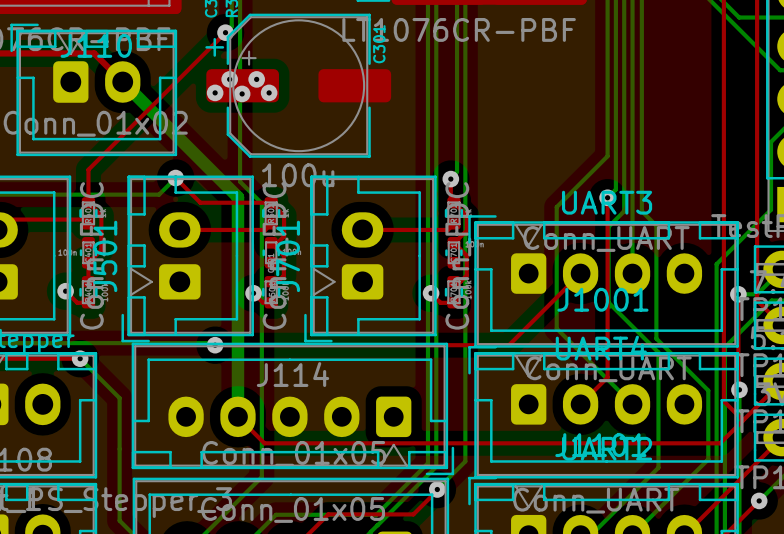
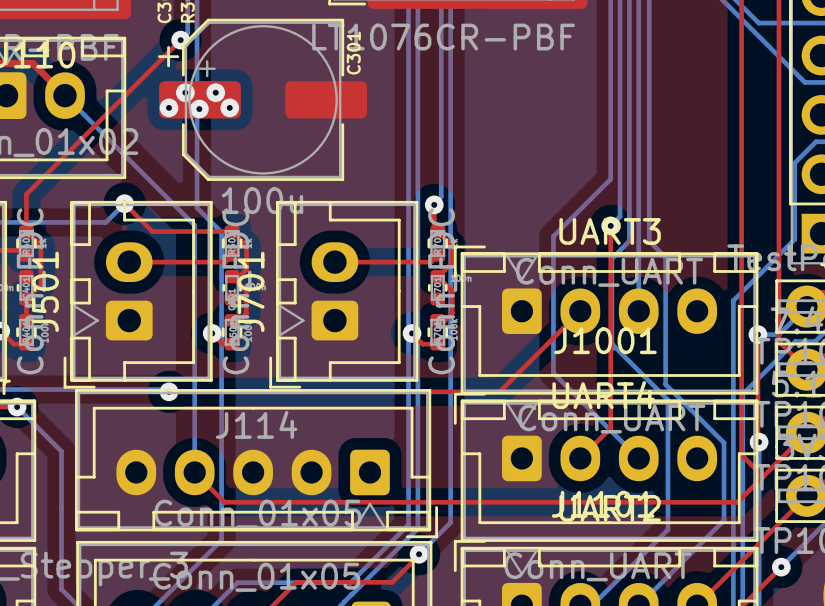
bottom track width: thick (122, 81) (237, 197) (237, 416) -> thin (64, 95) (194, 225) (194, 472)

